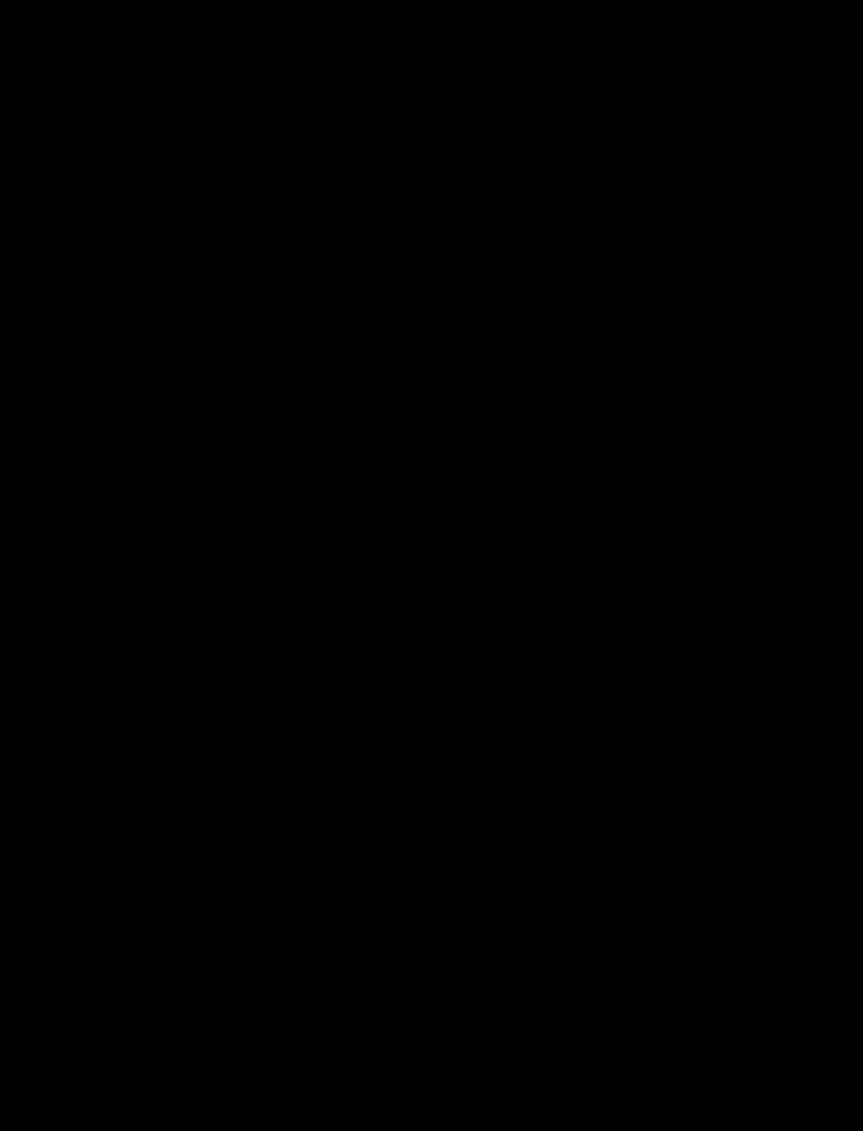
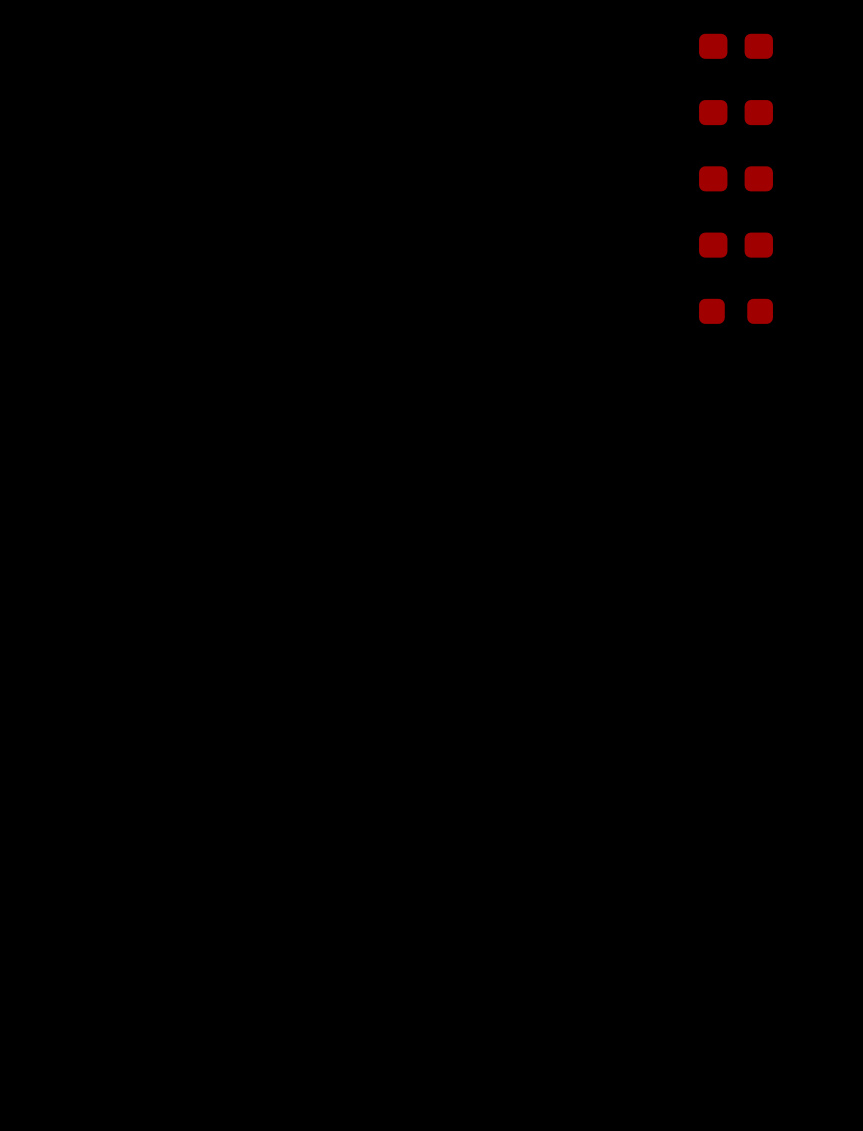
part: none -> (736, 46)
part: none -> (736, 112)
part: none -> (736, 178)
part: none -> (736, 245)
part: none -> (736, 311)

